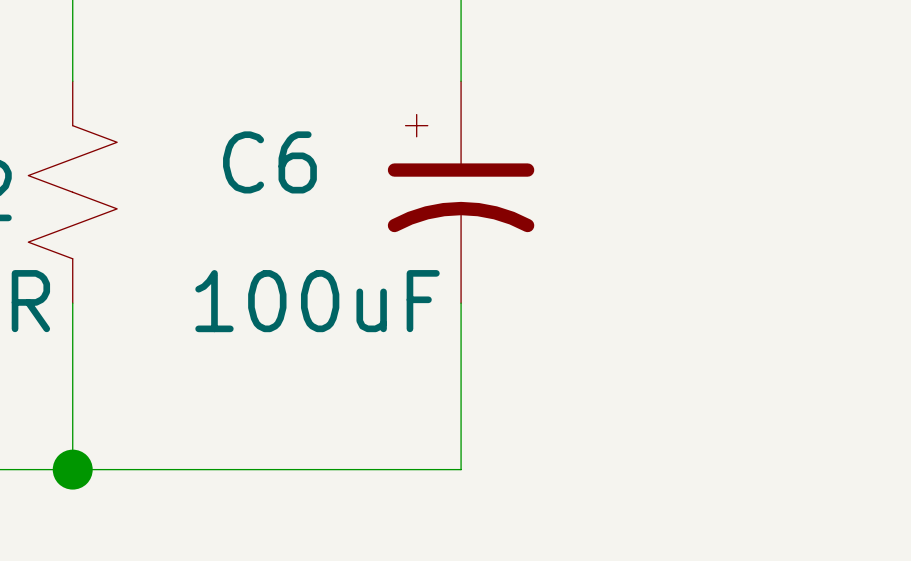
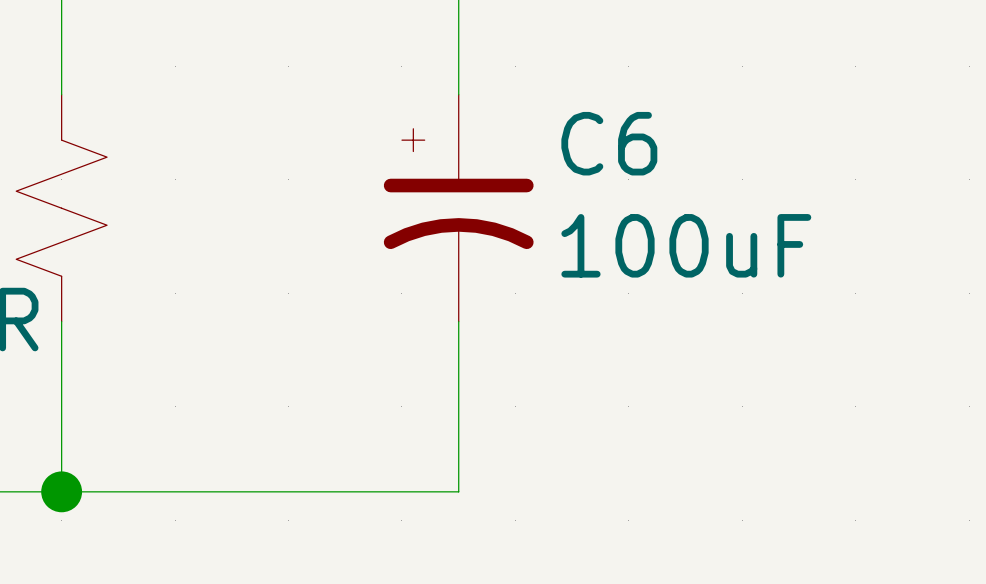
C6 name position: C6 (269, 162) -> C6 (609, 143)
C6 value position: 100uF (317, 301) -> 100uF (686, 245)

